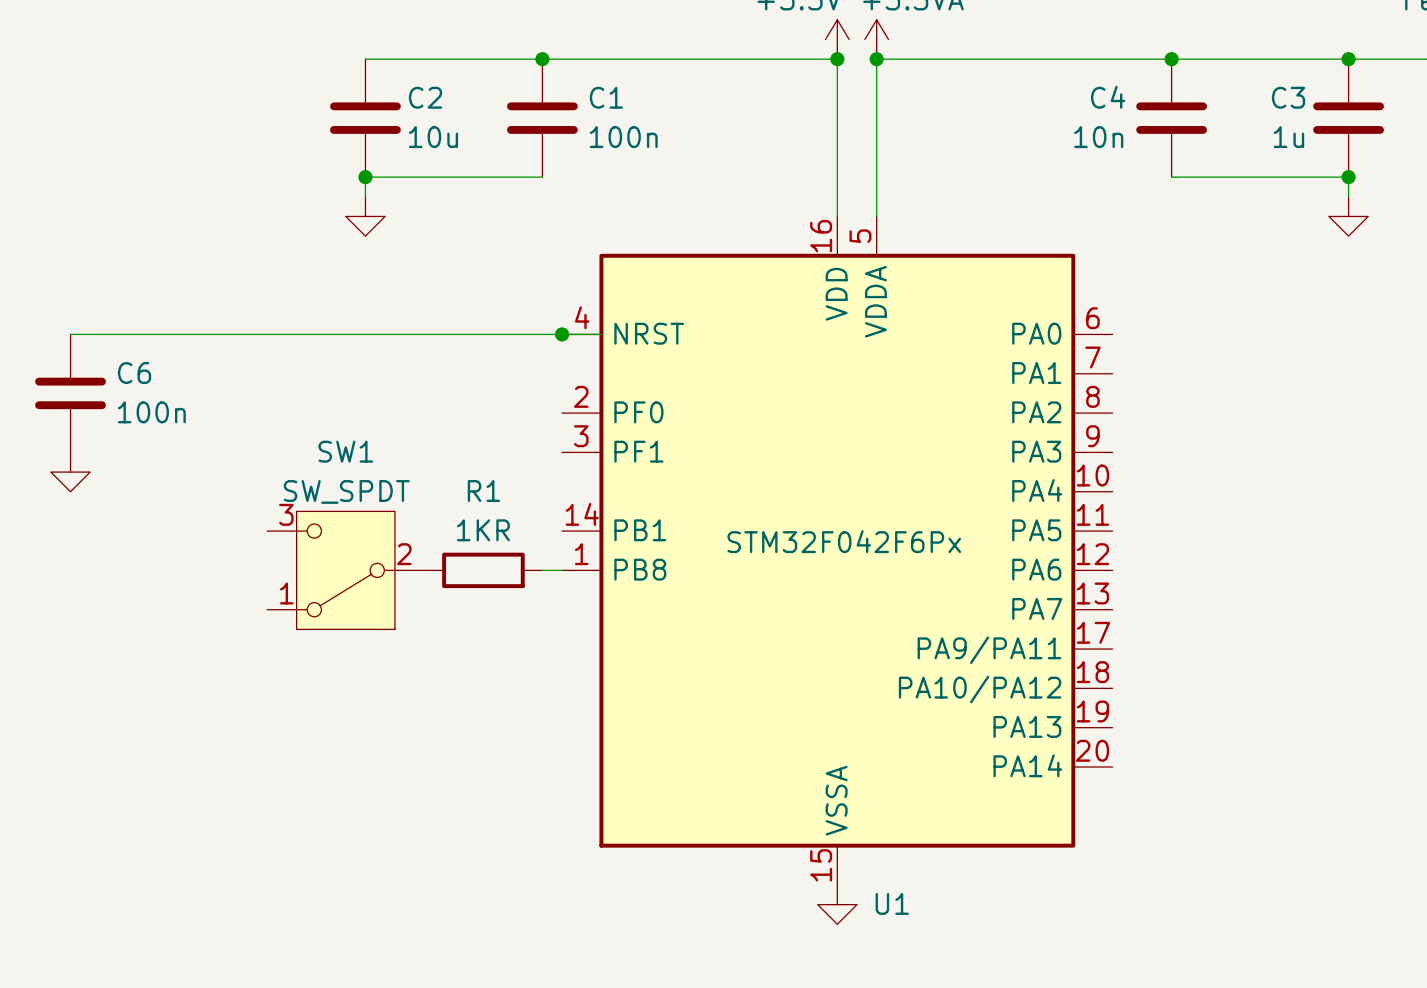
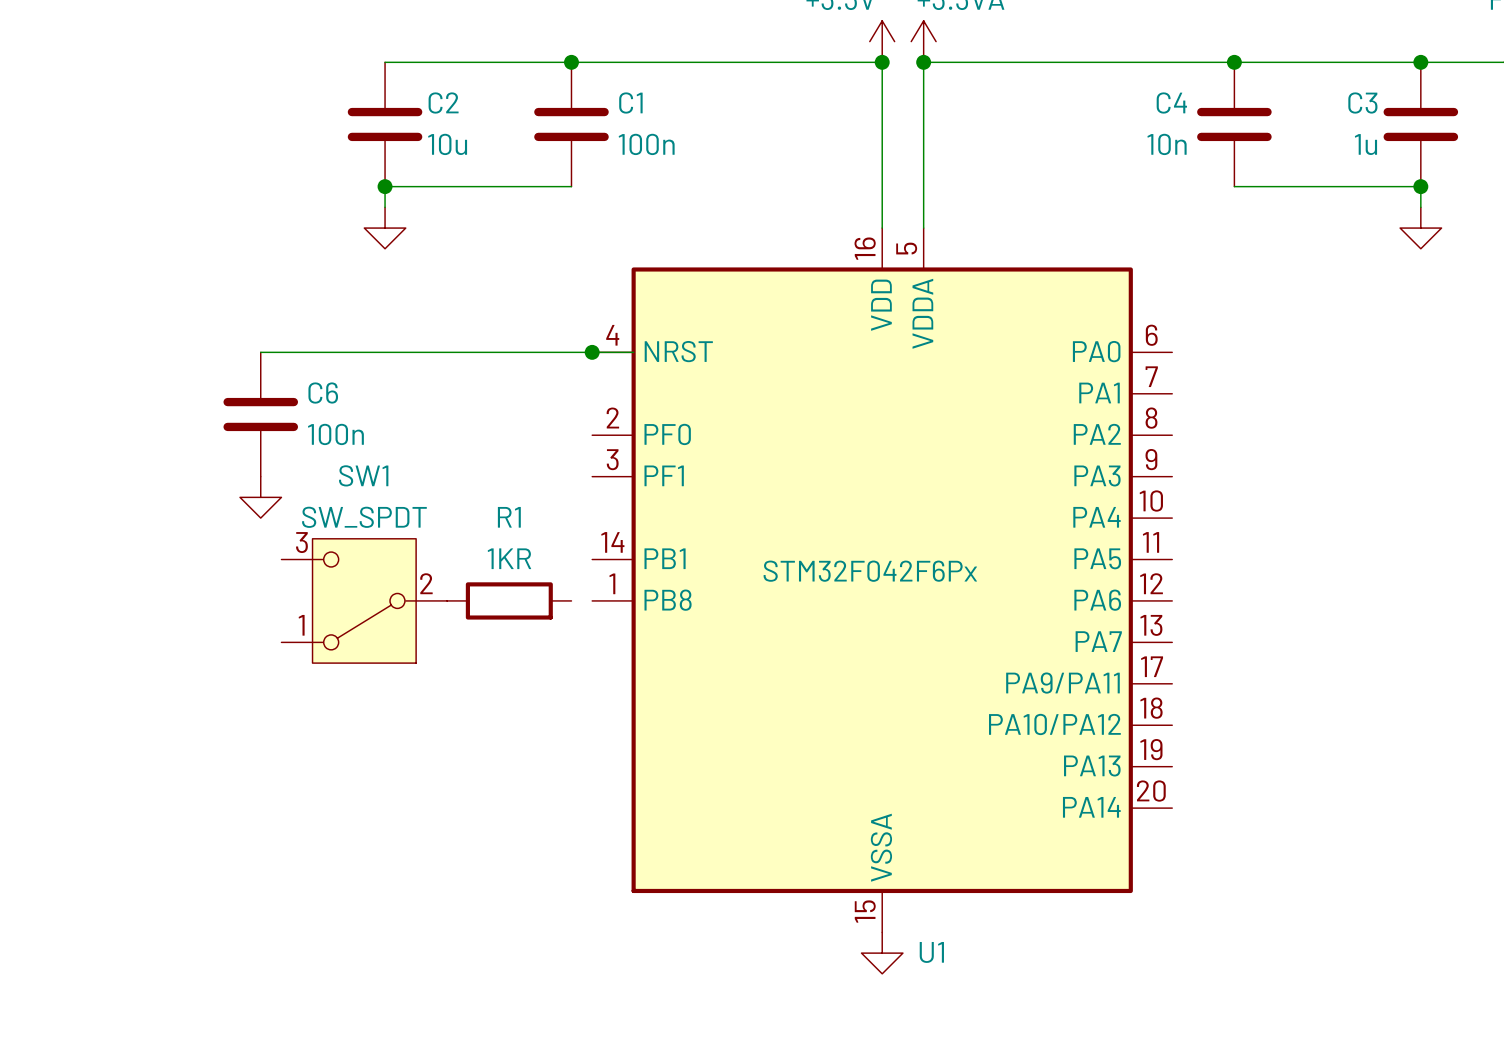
wire: (70, 334) (247, 334) -> none
C6 position: (70, 393) -> (260, 414)
power symbol position: (70, 472) -> (260, 497)
wire: (542, 570) (562, 570) -> none

